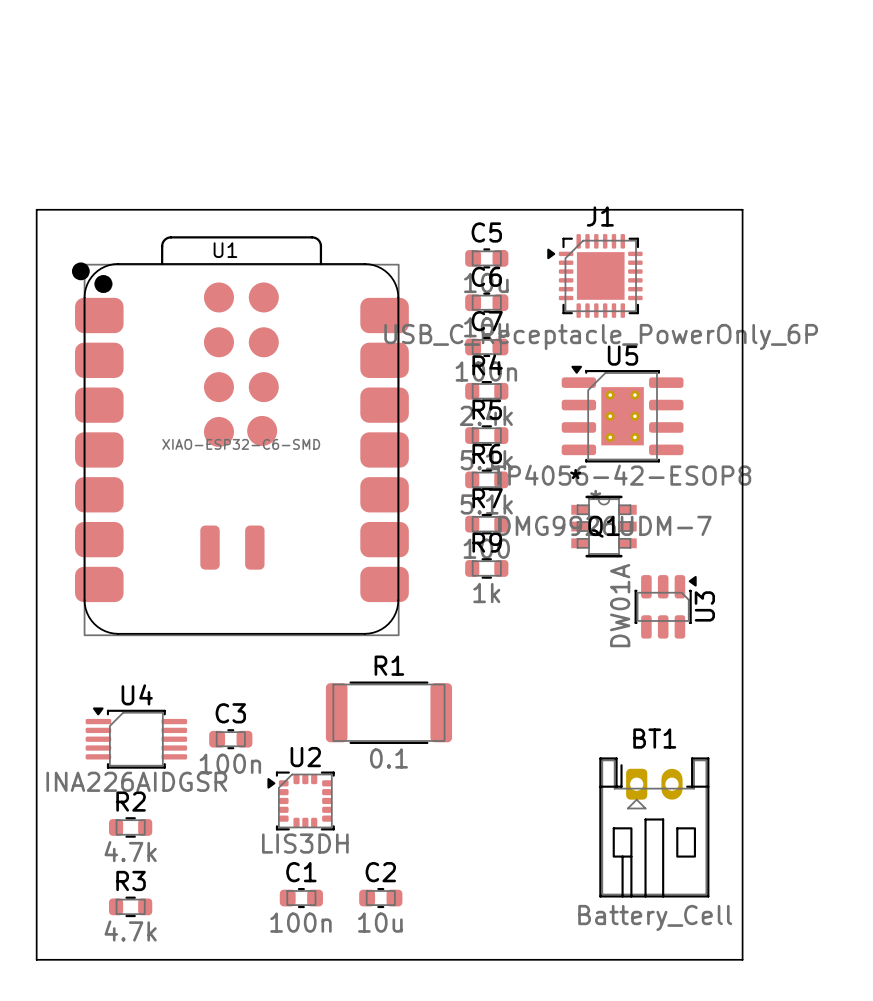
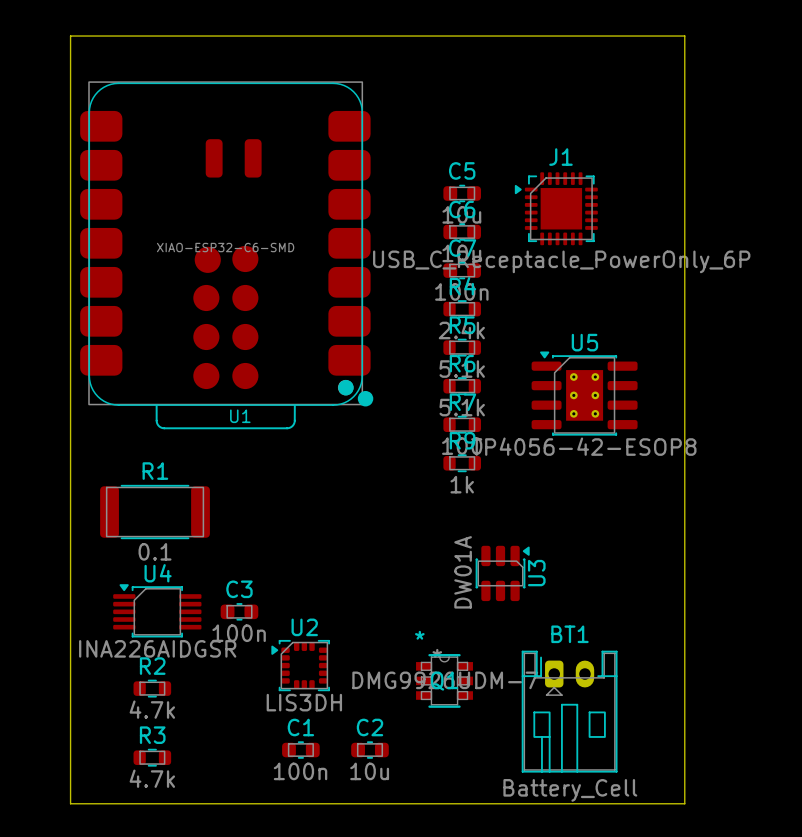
board edge: (36, 209) (742, 209) -> (70, 151) (70, 36) (684, 36) (684, 151)
U5 position: (622, 414) -> (584, 393)
U1 rotation: 0° (240, 436) -> 180° (226, 255)
Q1 position: (604, 526) -> (444, 680)
U3 position: (665, 606) -> (502, 573)
R1 position: (388, 712) -> (155, 512)
BT1 position: (654, 827) -> (569, 711)

